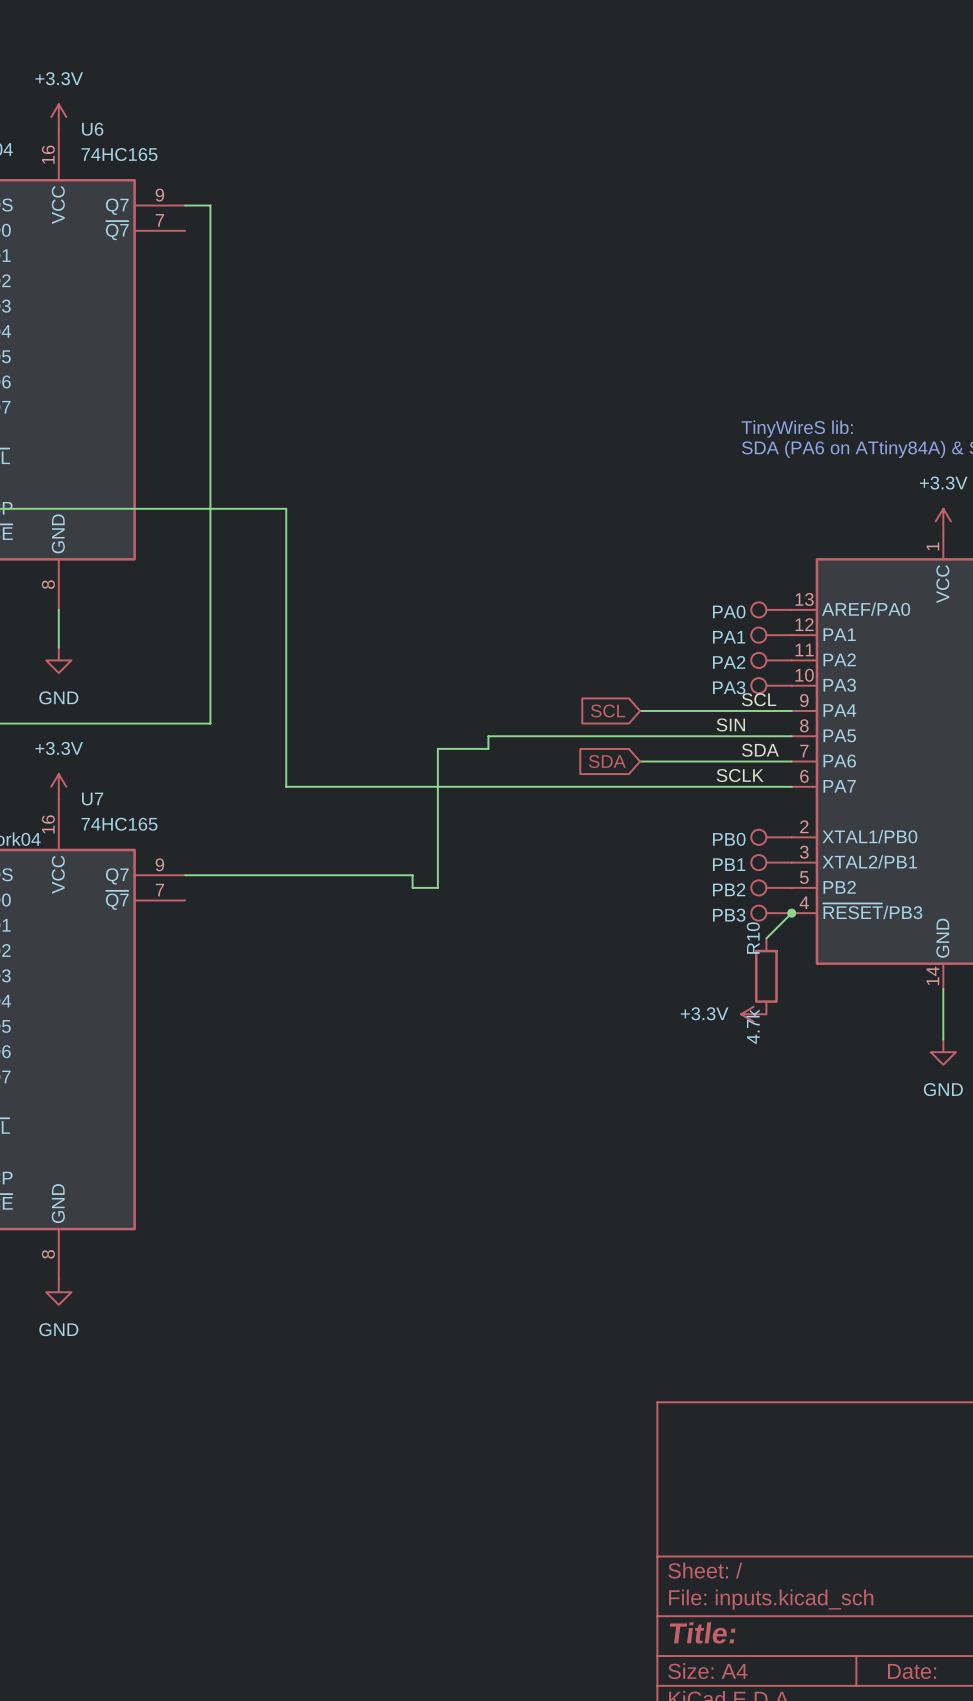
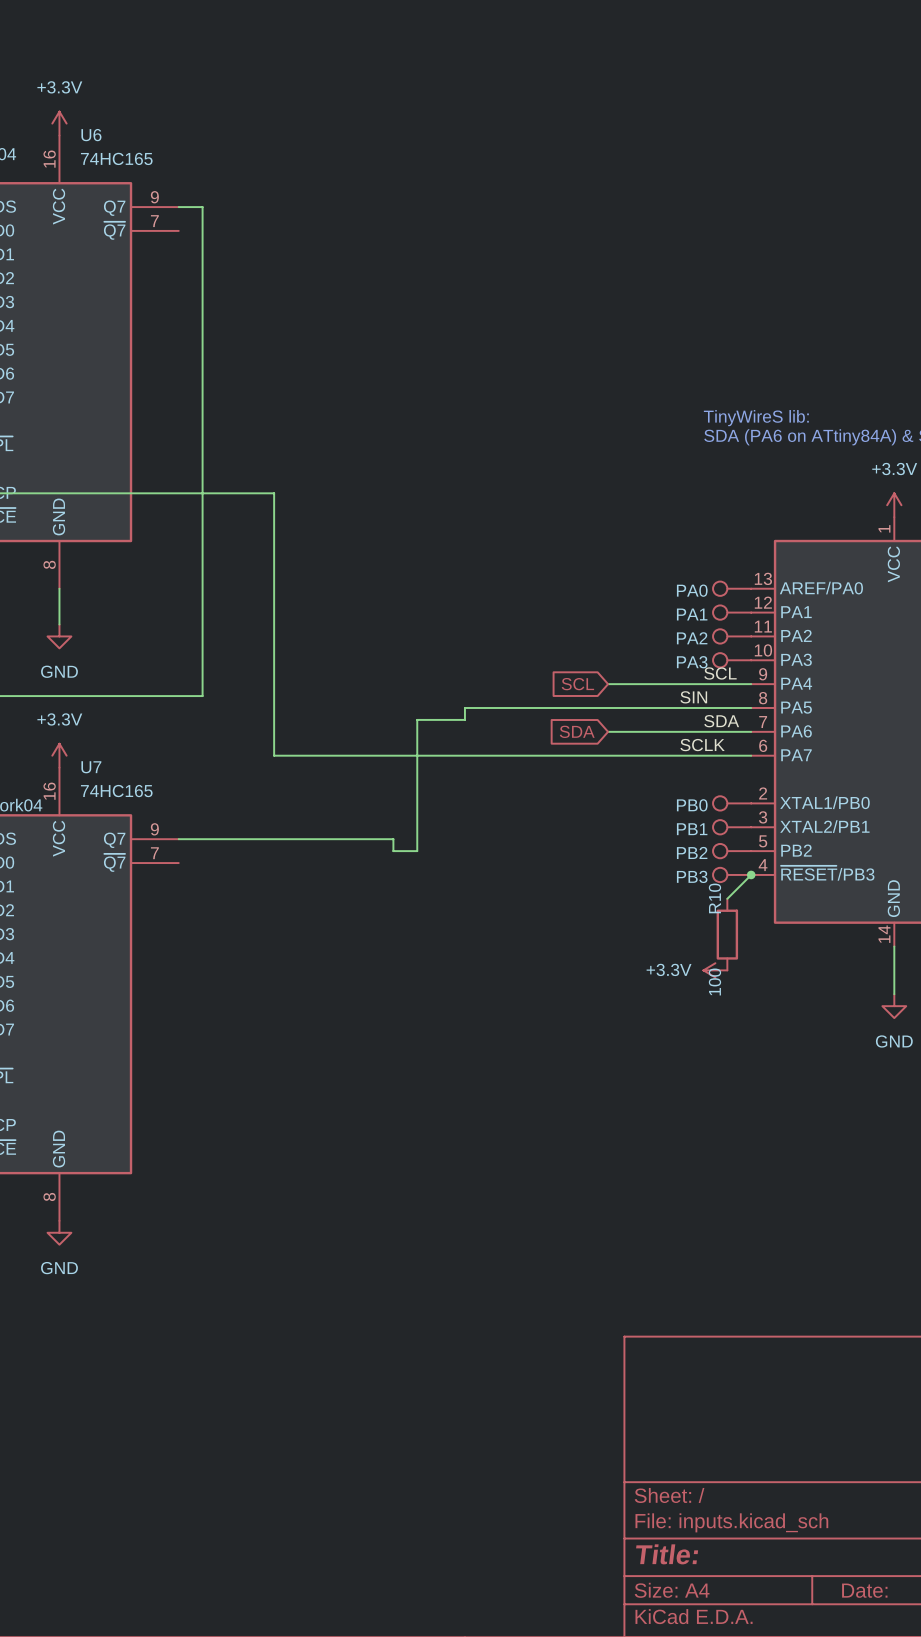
R10 value: 4.7k (752, 1026) -> 100 (714, 981)

